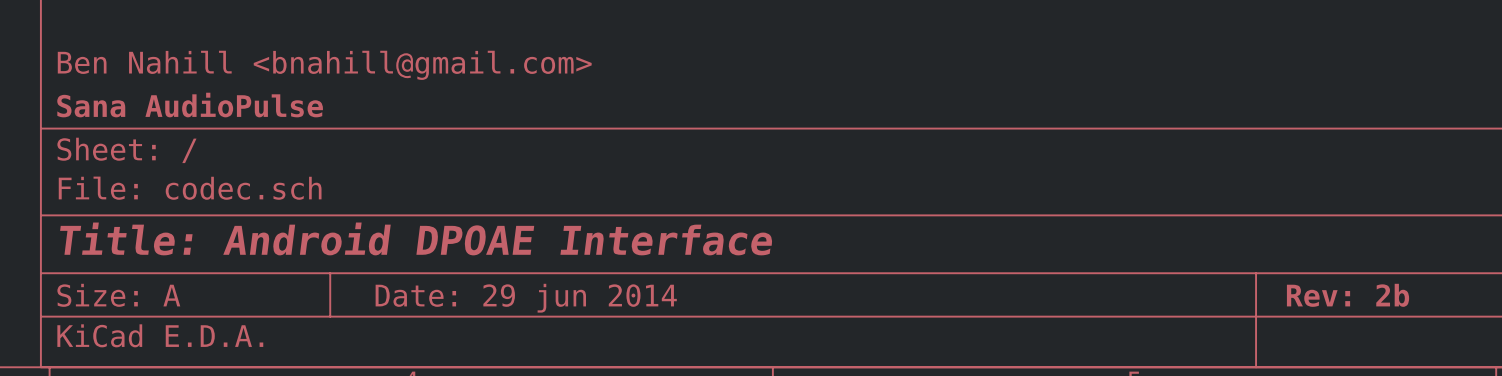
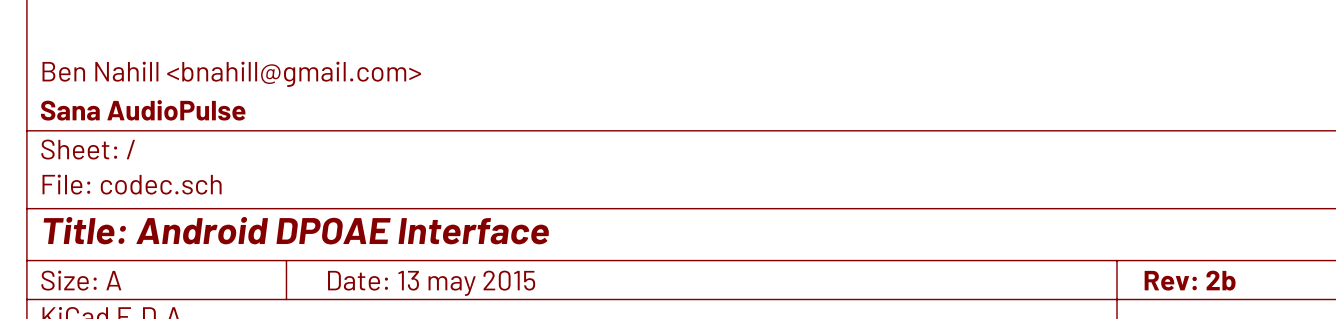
title block: Date: 29 jun 2014 (526, 298) -> Date: 13 may 2015 (431, 283)

